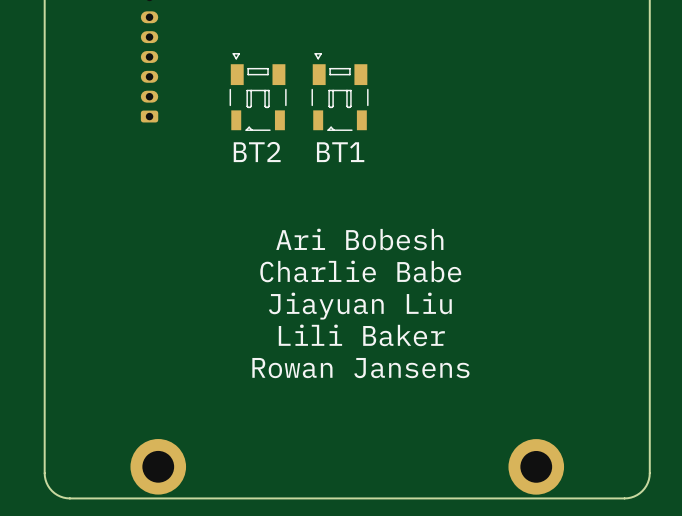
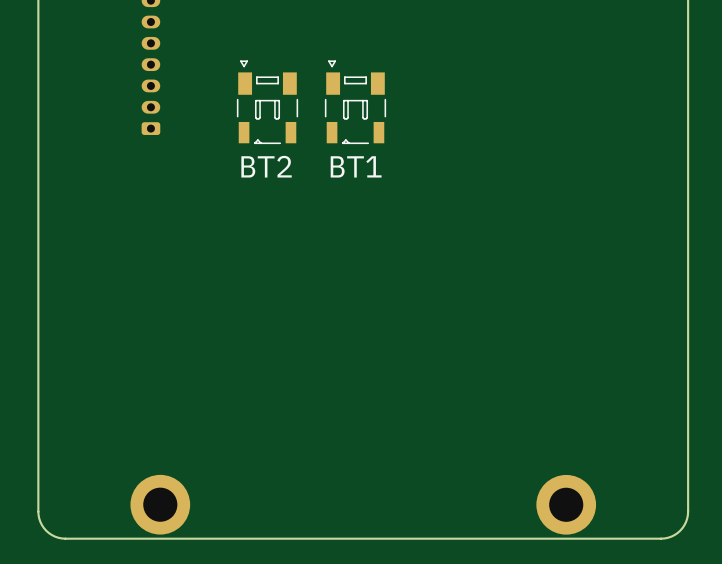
text: Ari Bobesh (359, 239) -> none
text: Charlie Babe (360, 271) -> none
text: Jiayuan Liu (360, 306) -> none
text: Lili Baker (361, 335) -> none
text: Rowan Jansens (360, 368) -> none

